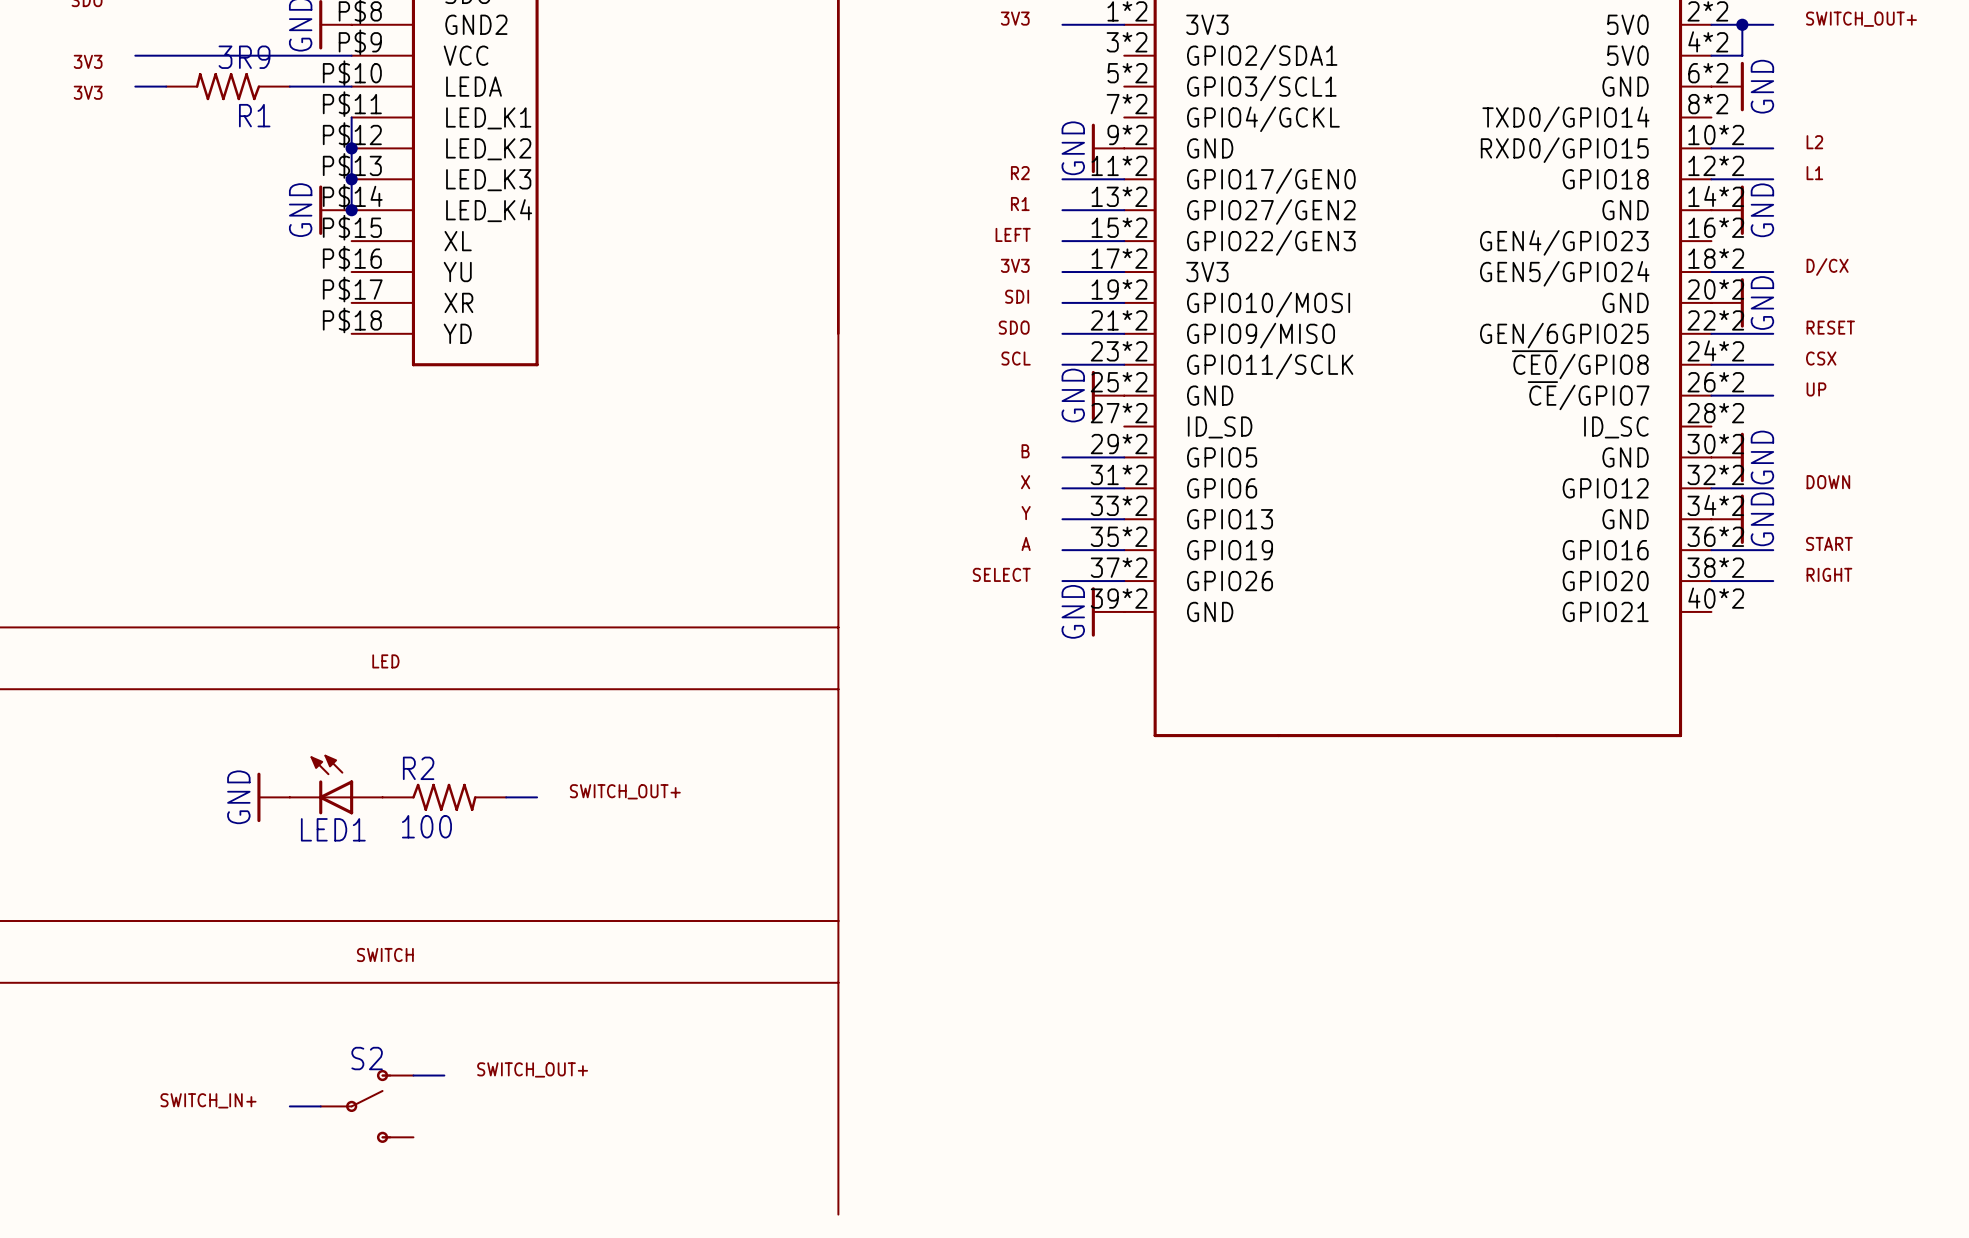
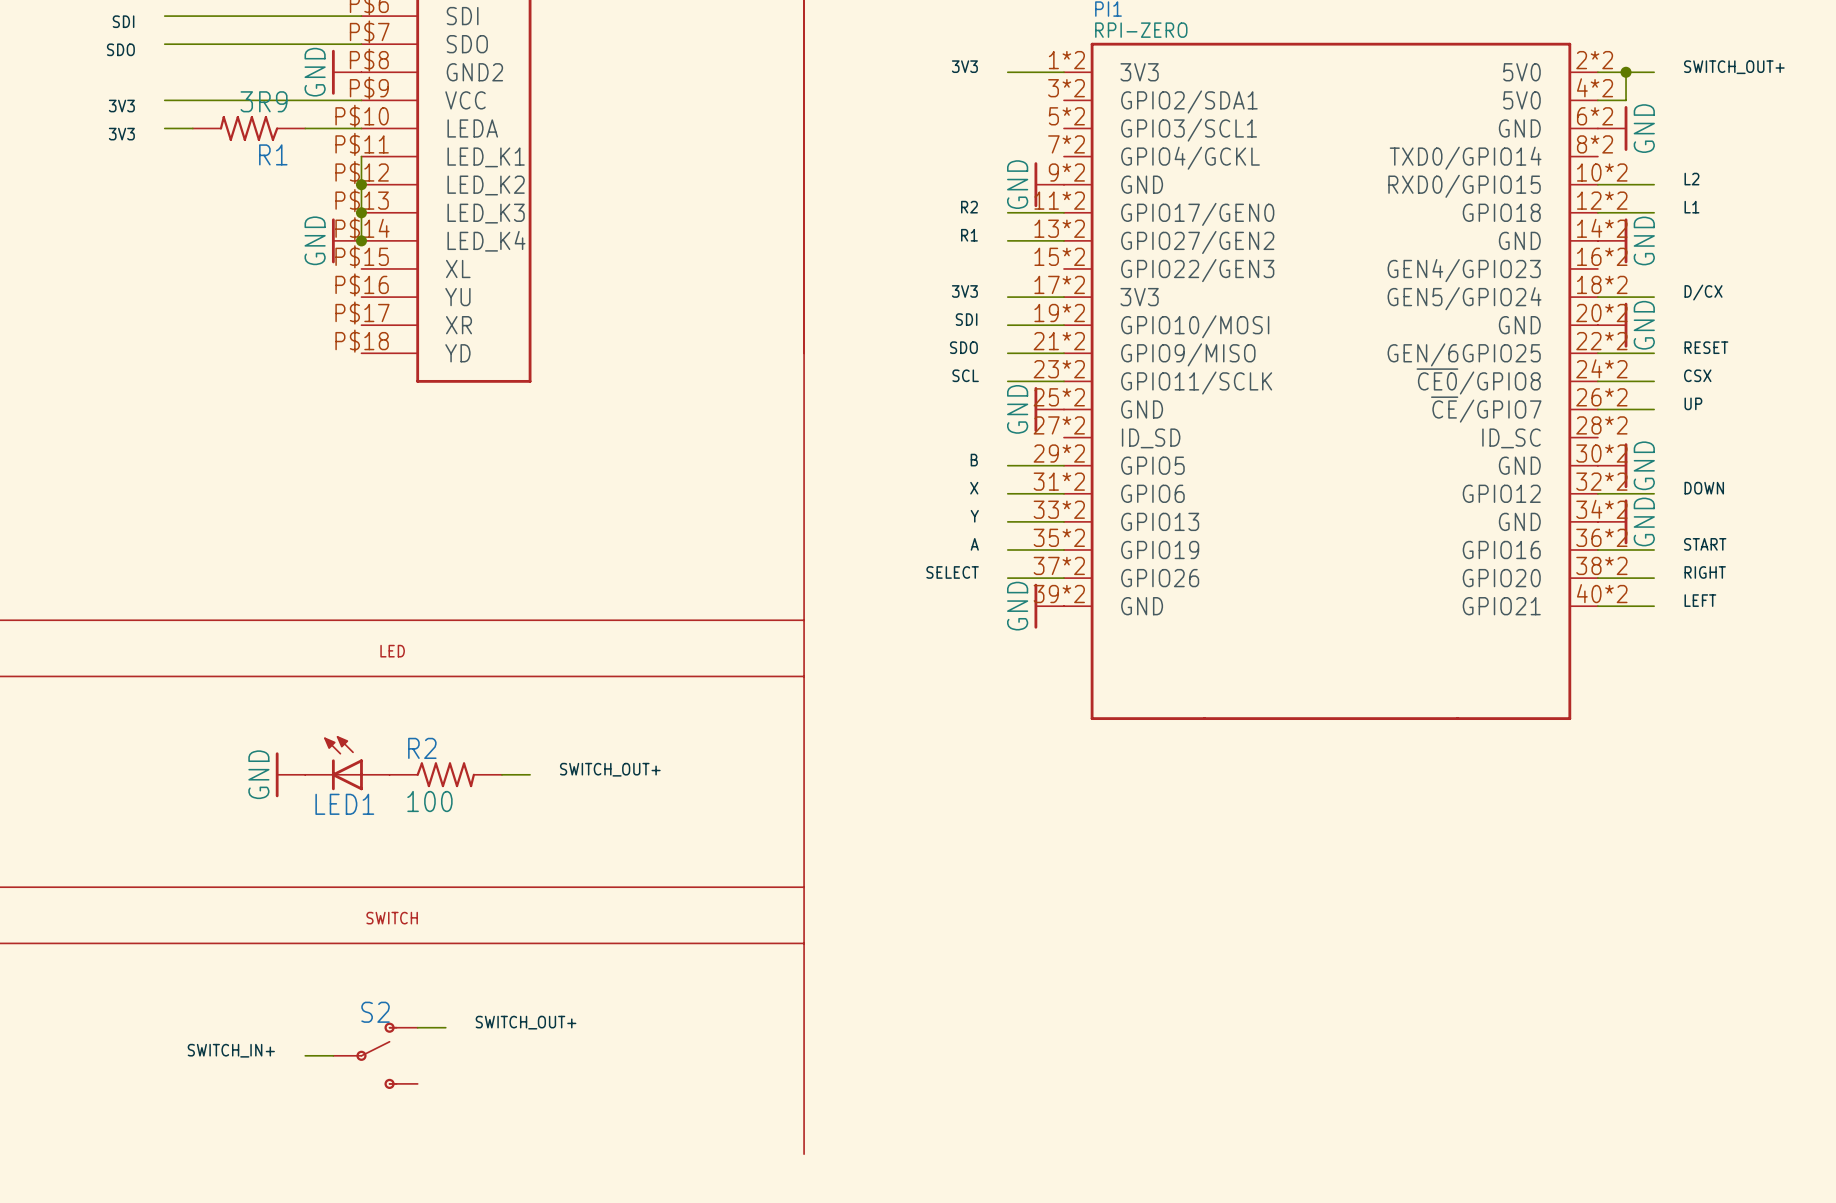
label: LEFT (1013, 234) -> none
wire: (1062, 241) (1124, 241) -> none
label: none -> LEFT (1700, 600)
wire: none -> (1597, 606) (1654, 606)

